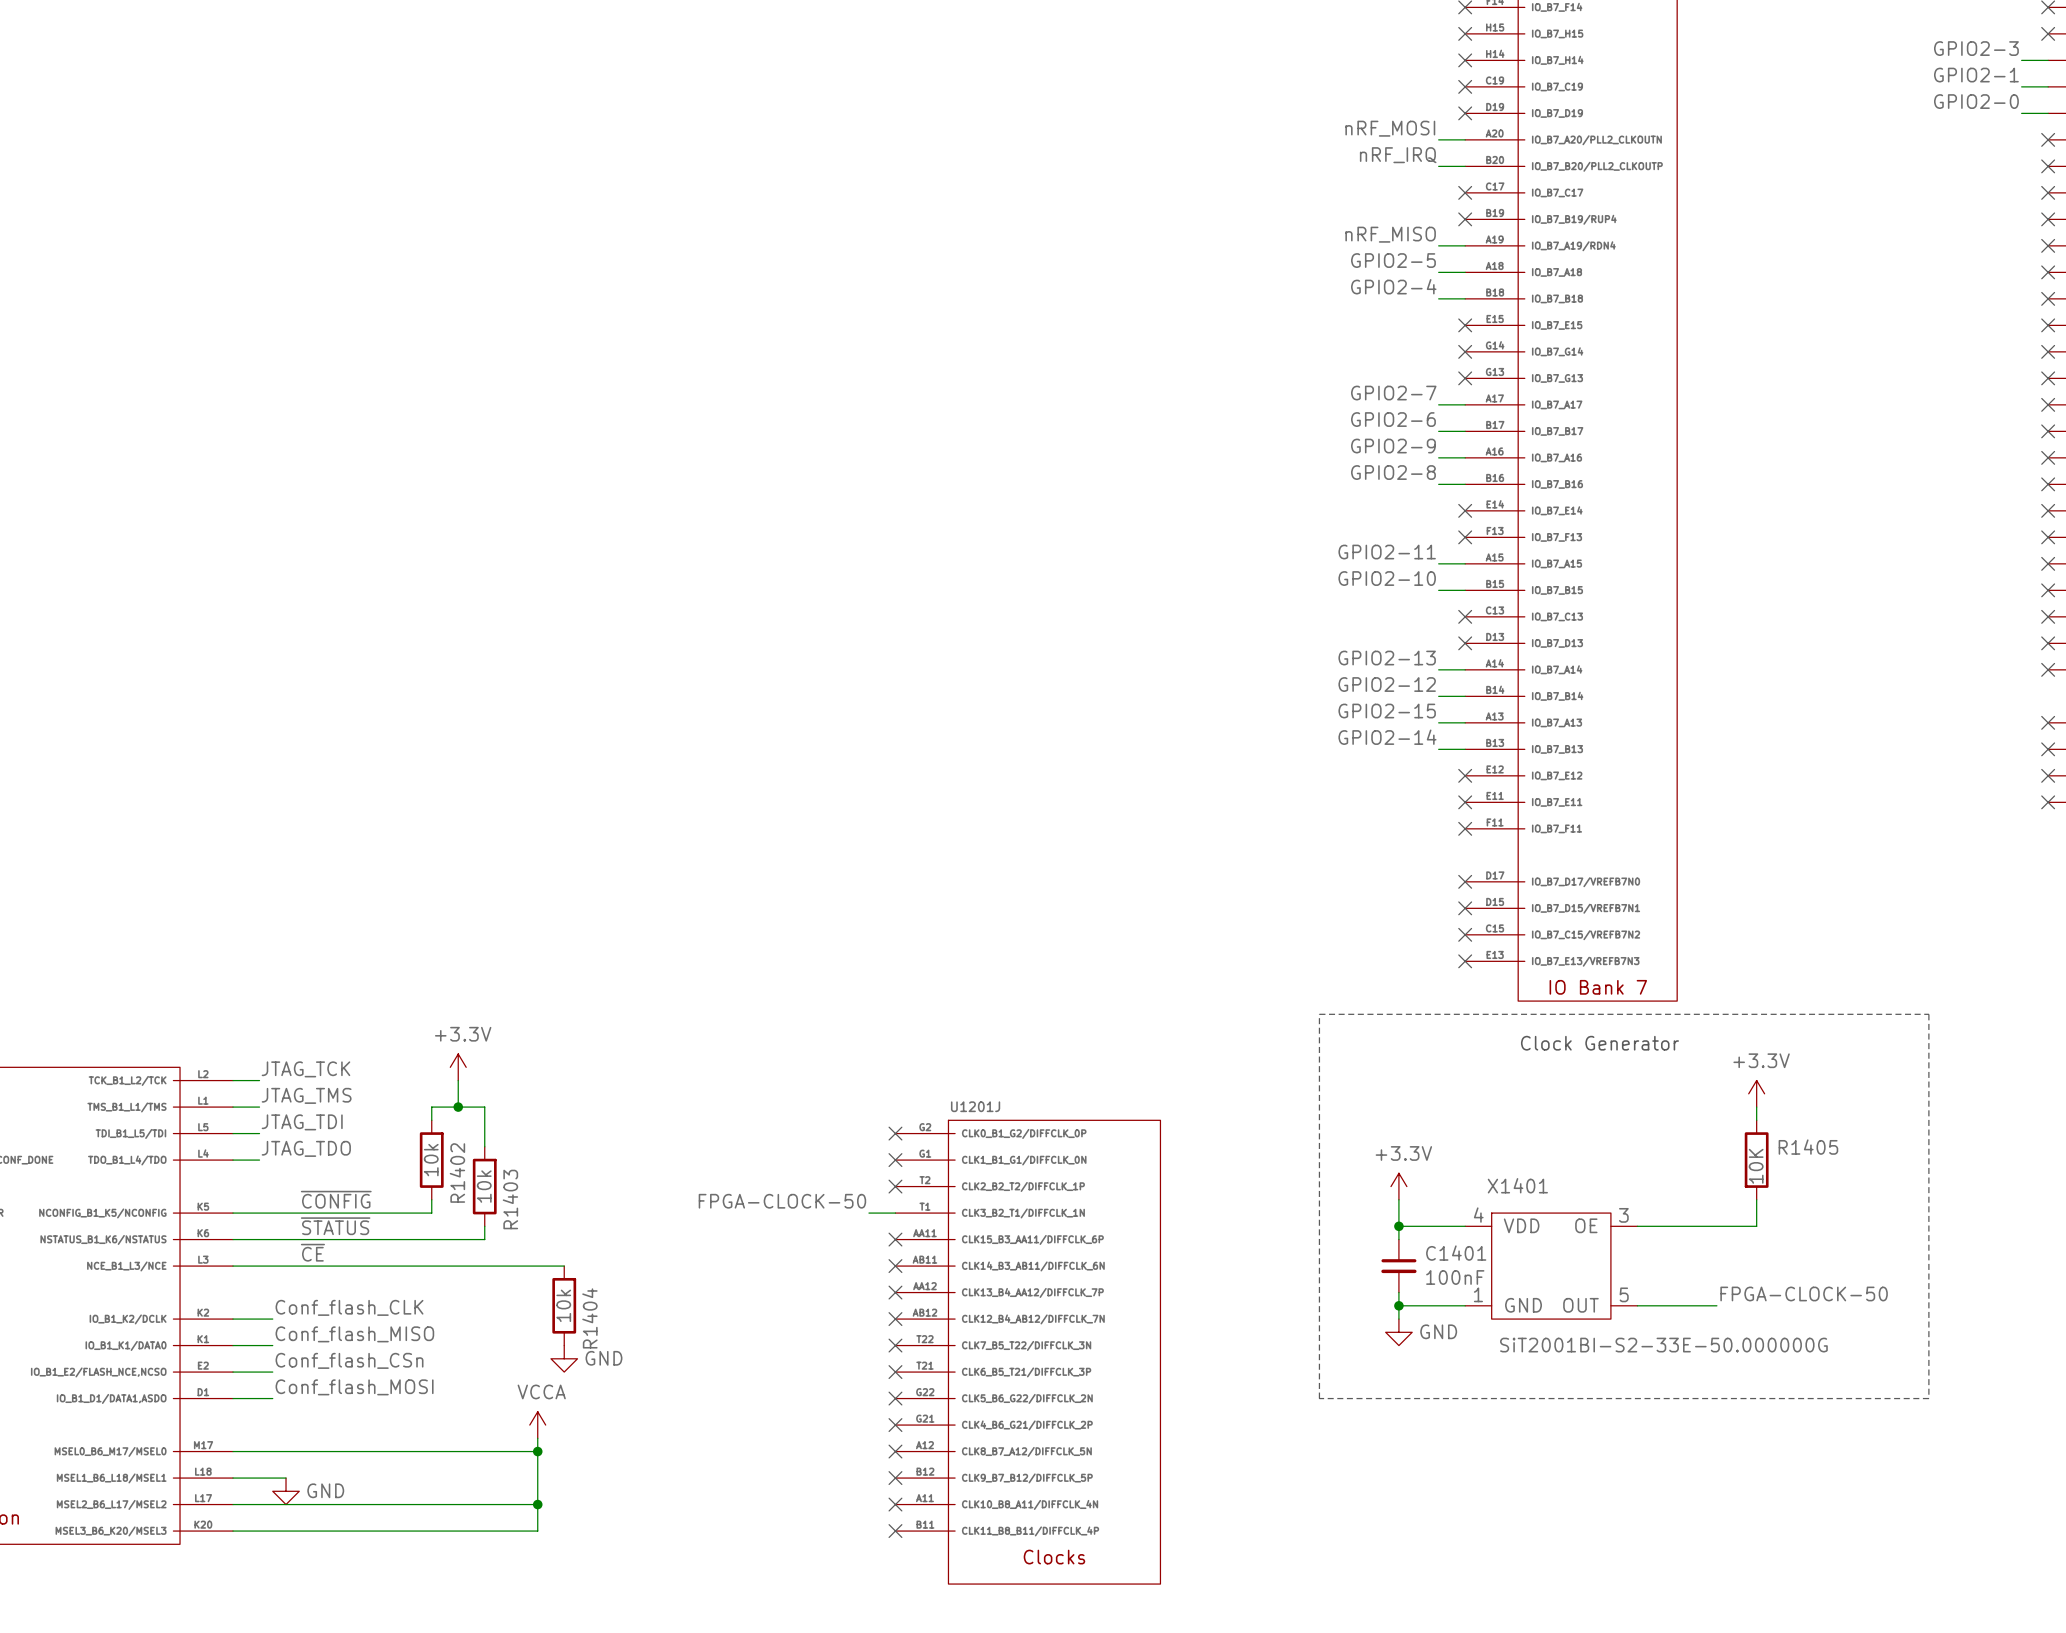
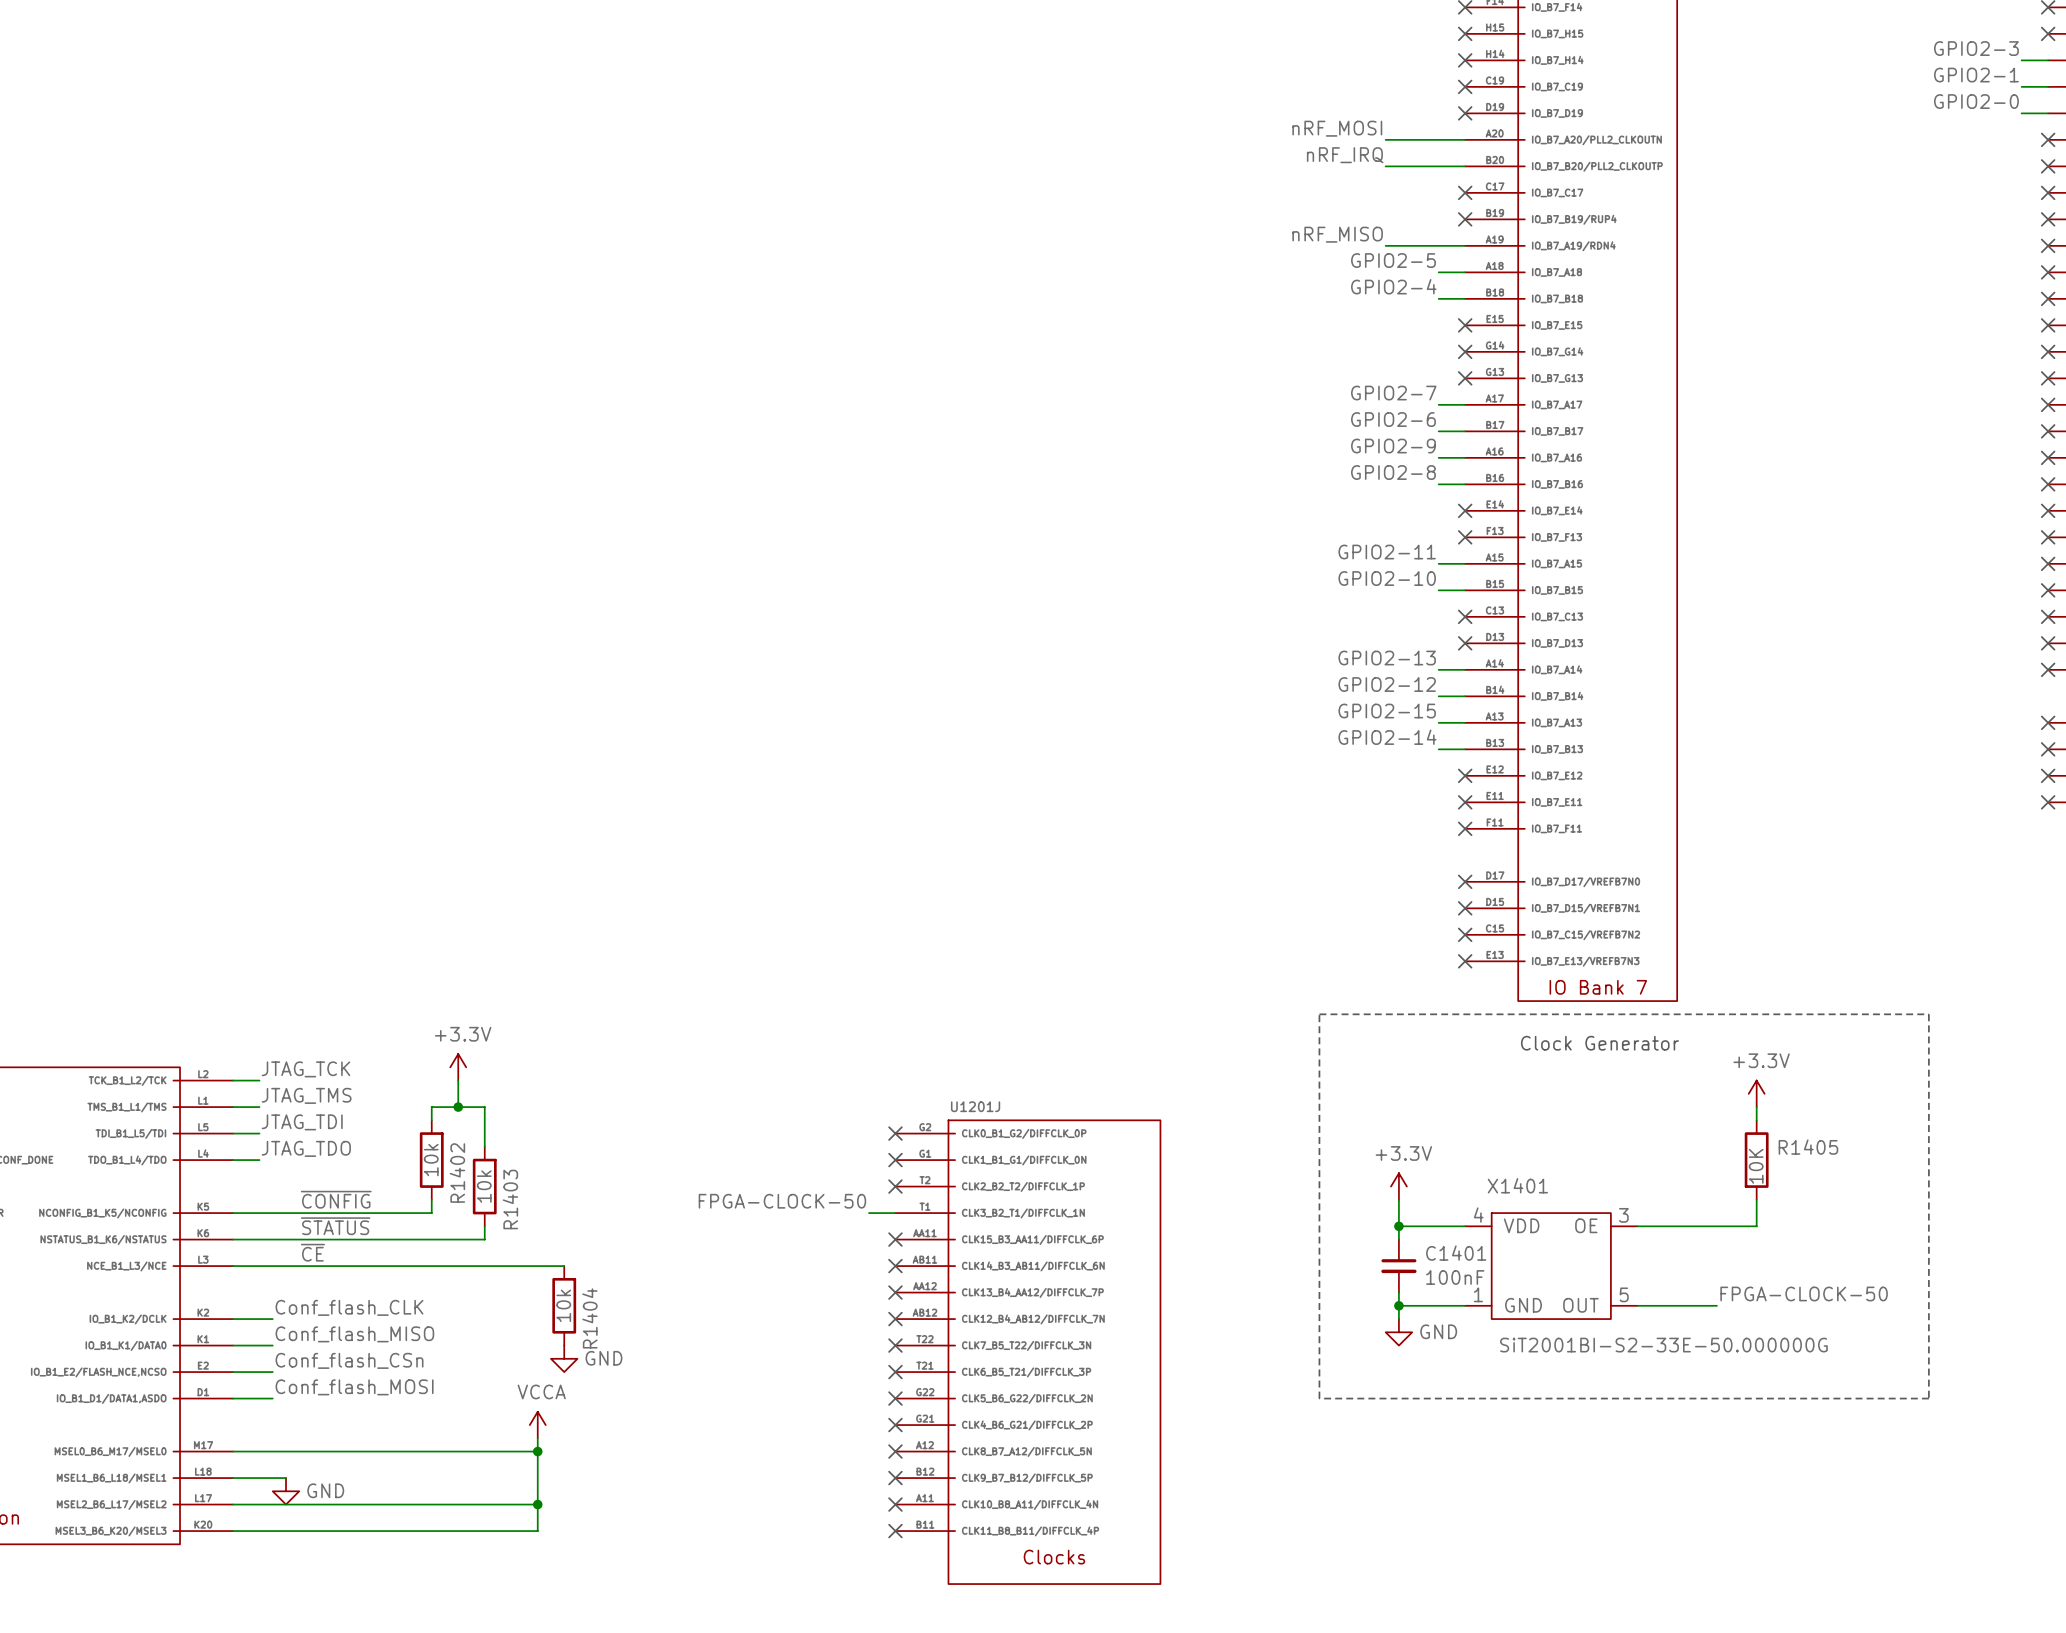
label position: nRF_MOSI (1390, 128) -> nRF_MOSI (1337, 128)
wire: none -> (1385, 139) (1438, 139)
label position: nRF_IRQ (1398, 155) -> nRF_IRQ (1345, 155)
wire: none -> (1385, 166) (1438, 166)
label position: nRF_MISO (1390, 234) -> nRF_MISO (1337, 234)
wire: none -> (1385, 245) (1438, 245)

